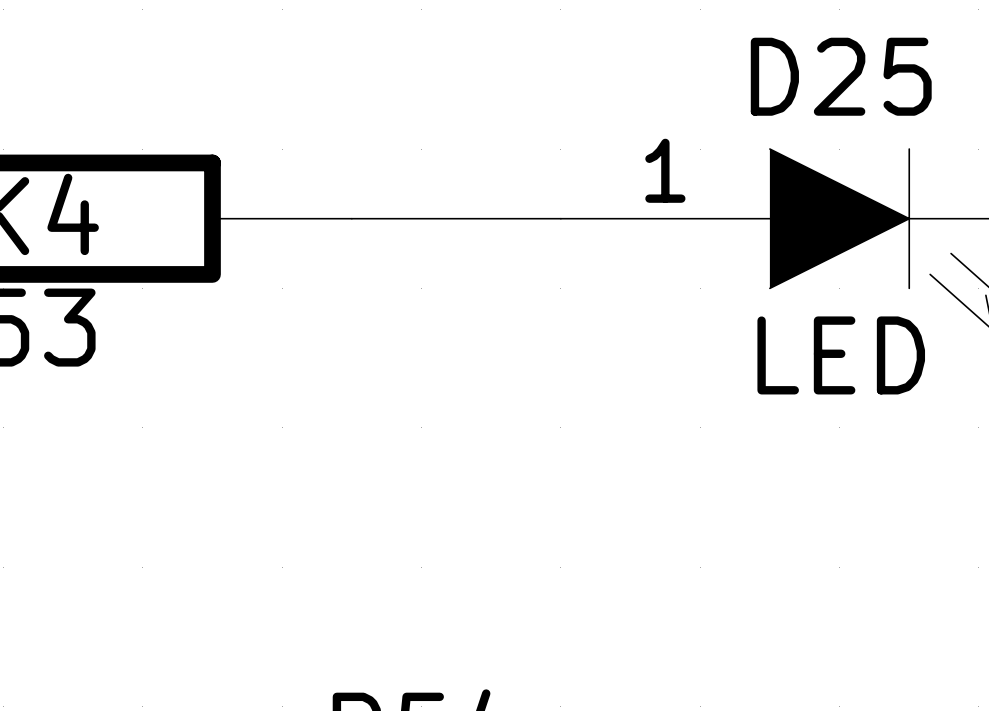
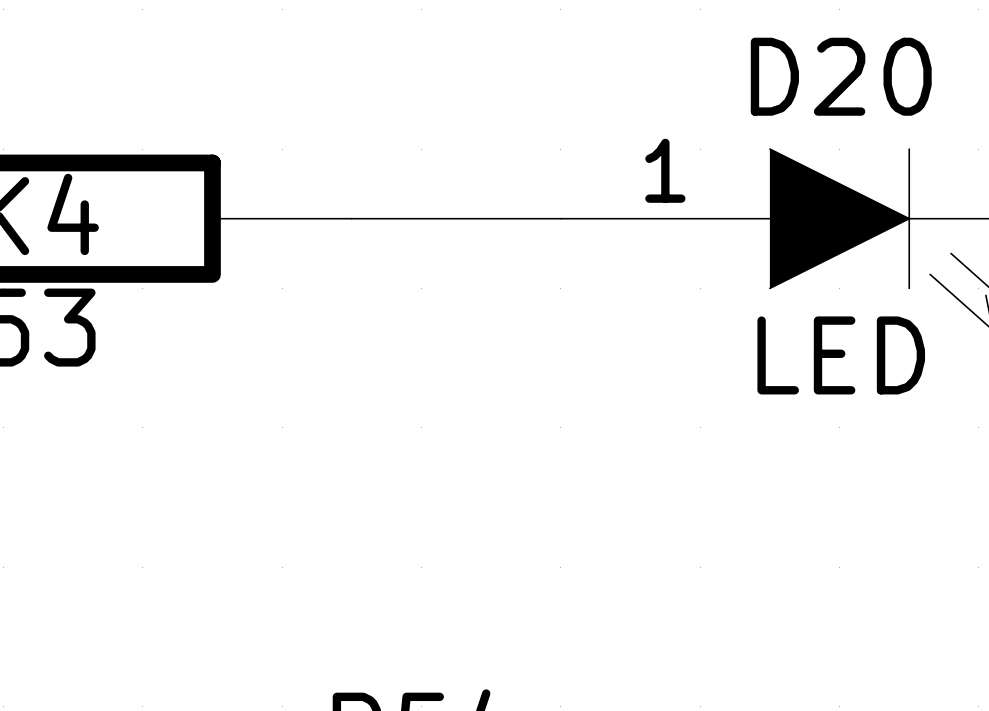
D25 name: D25 (841, 76) -> D20 (841, 76)

